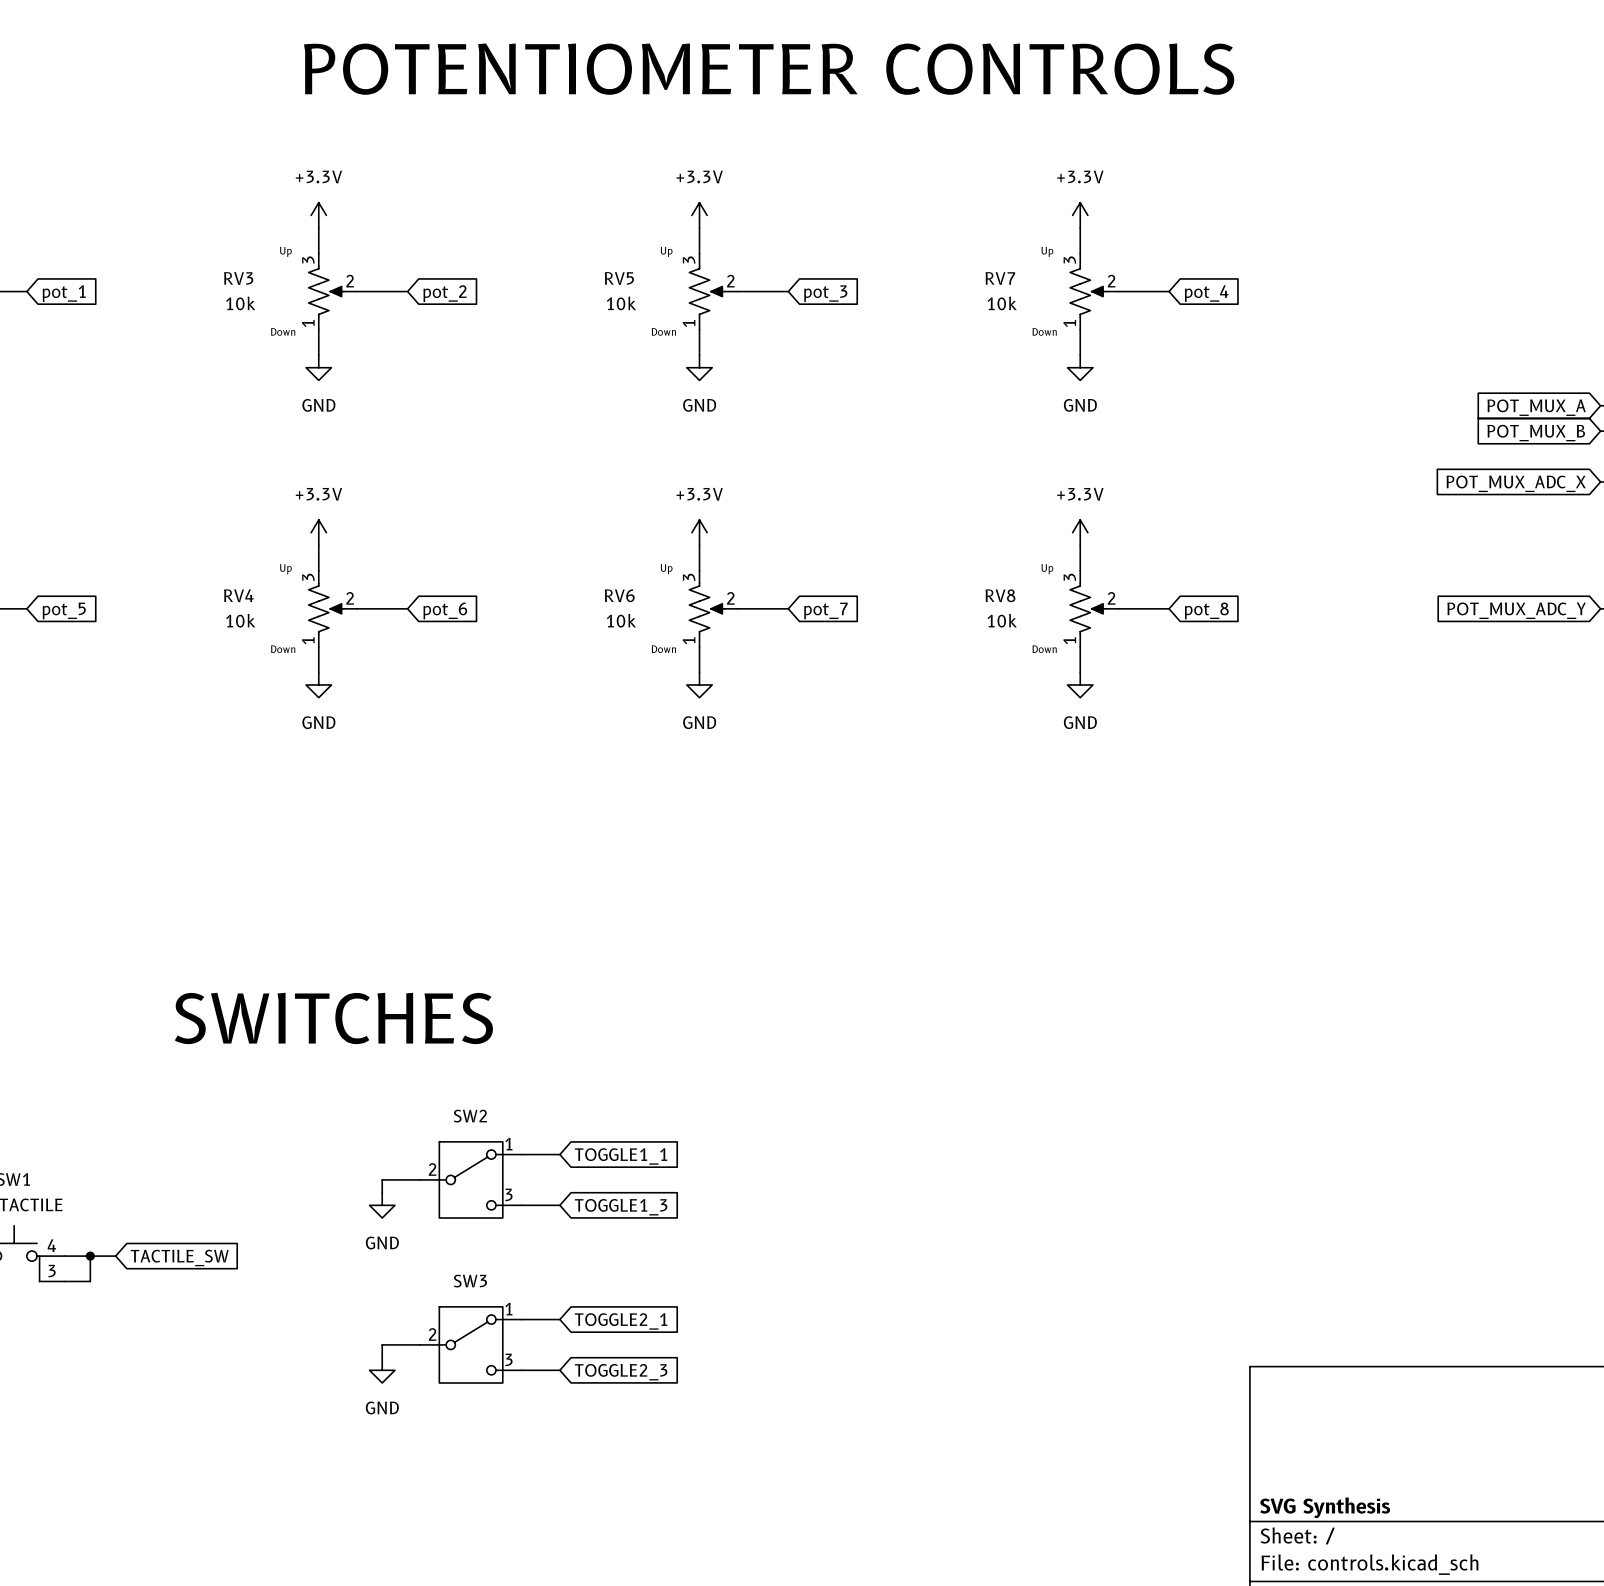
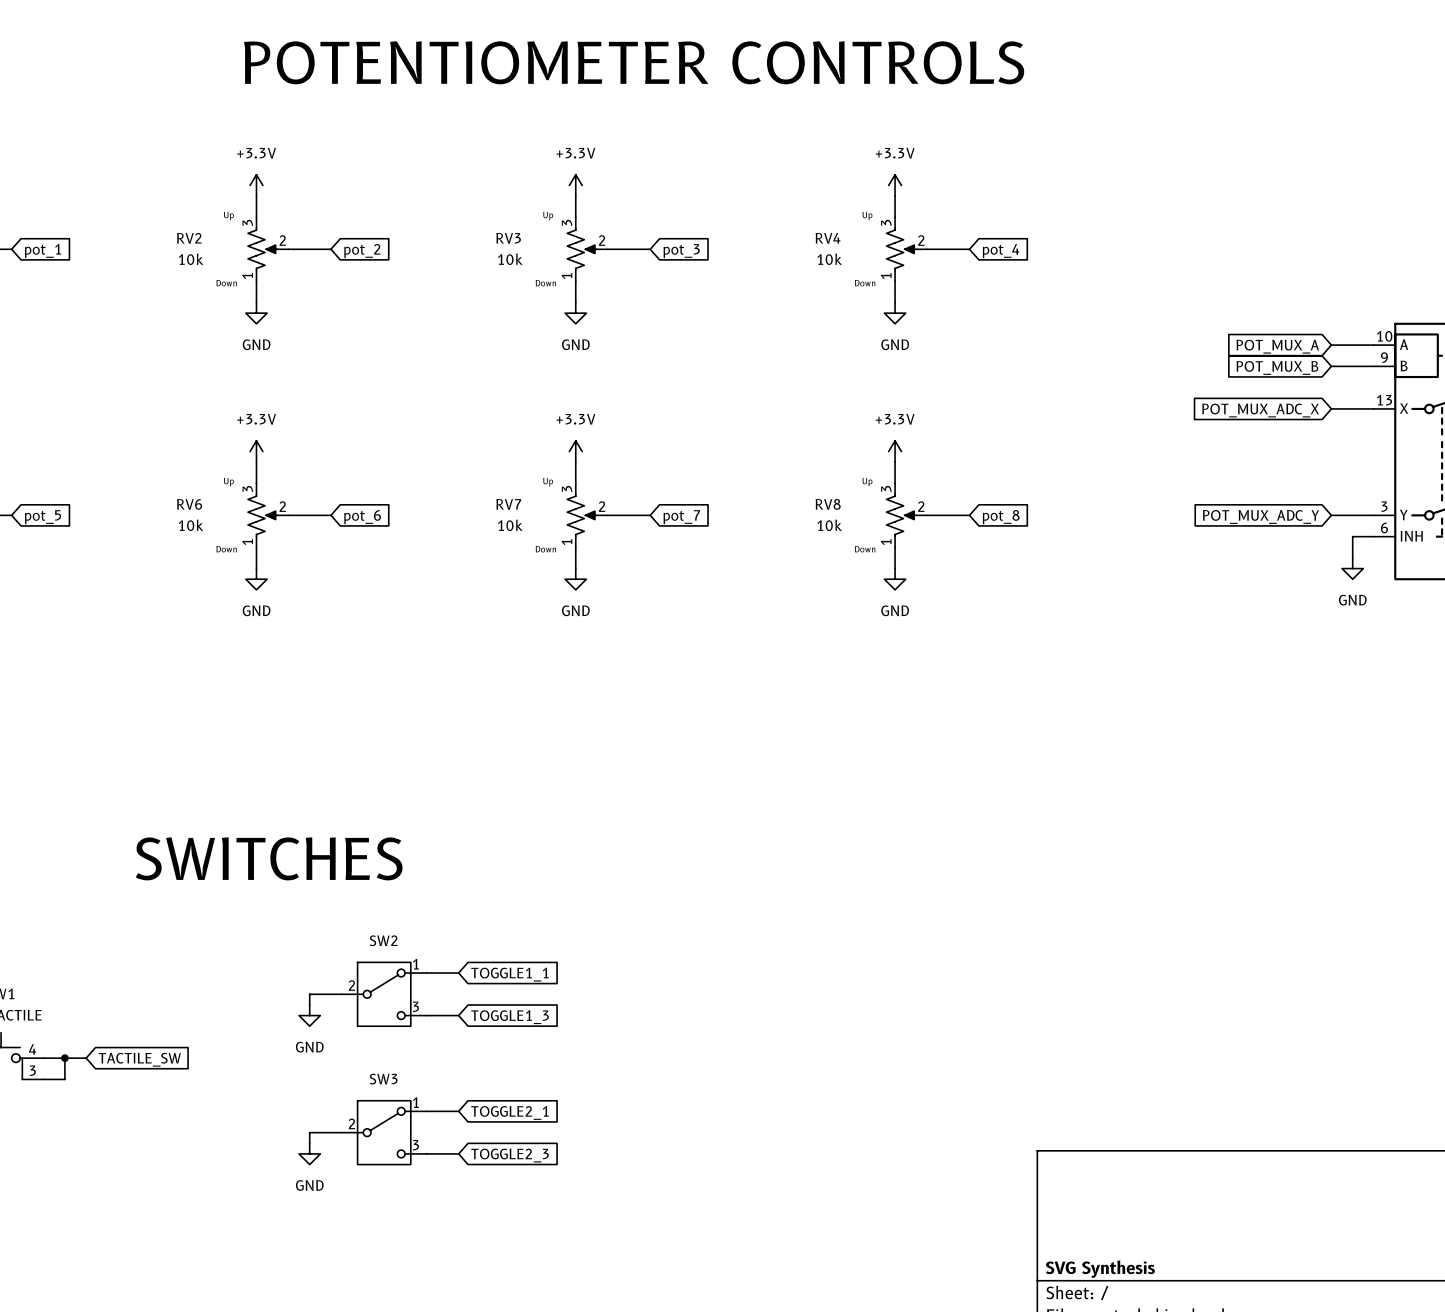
RV3 name: RV3 (238, 278) -> RV2 (189, 238)
RV5 name: RV5 (619, 278) -> RV3 (508, 238)
RV7 name: RV7 (1000, 278) -> RV4 (828, 238)
RV4 name: RV4 (238, 595) -> RV6 (189, 504)
RV6 name: RV6 (619, 595) -> RV7 (508, 504)

